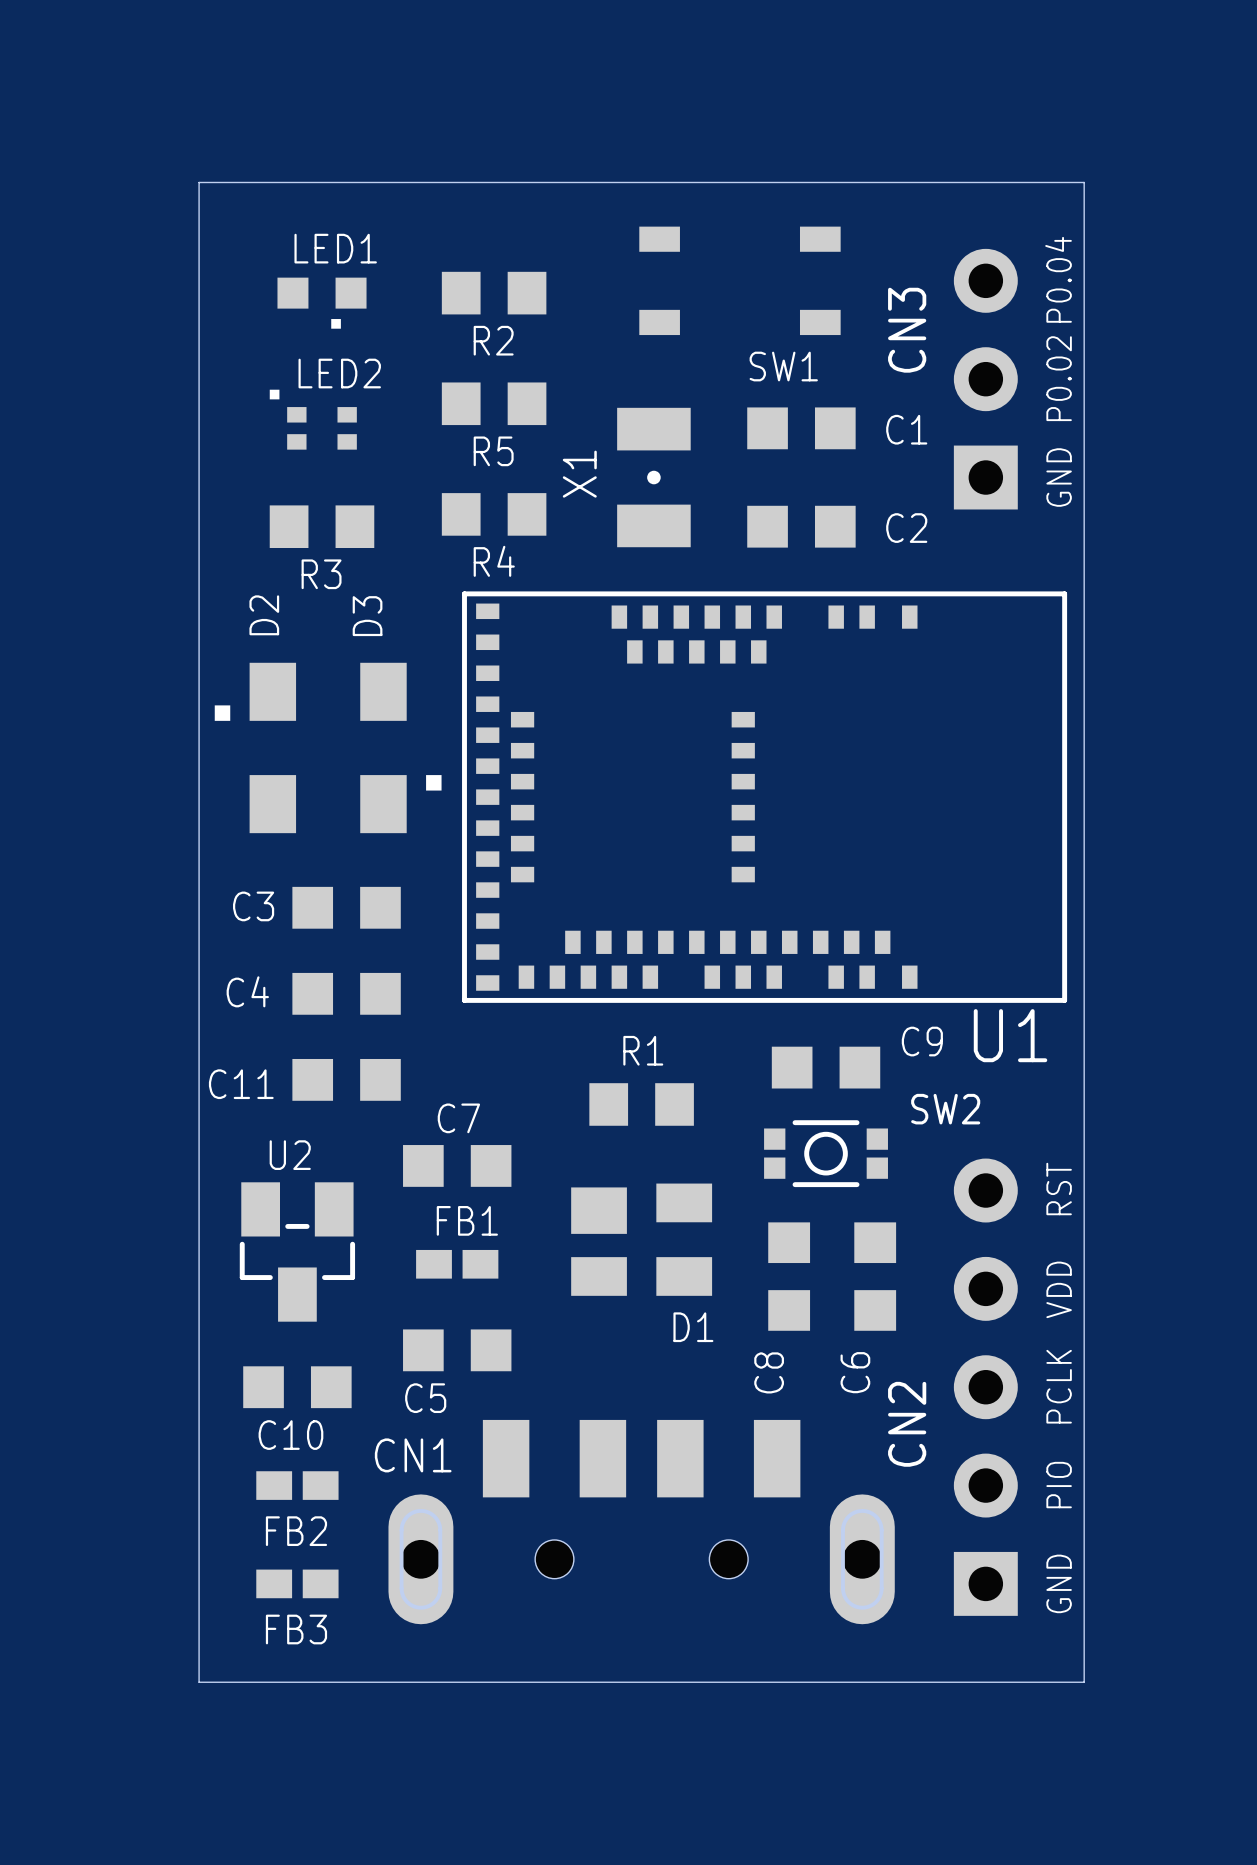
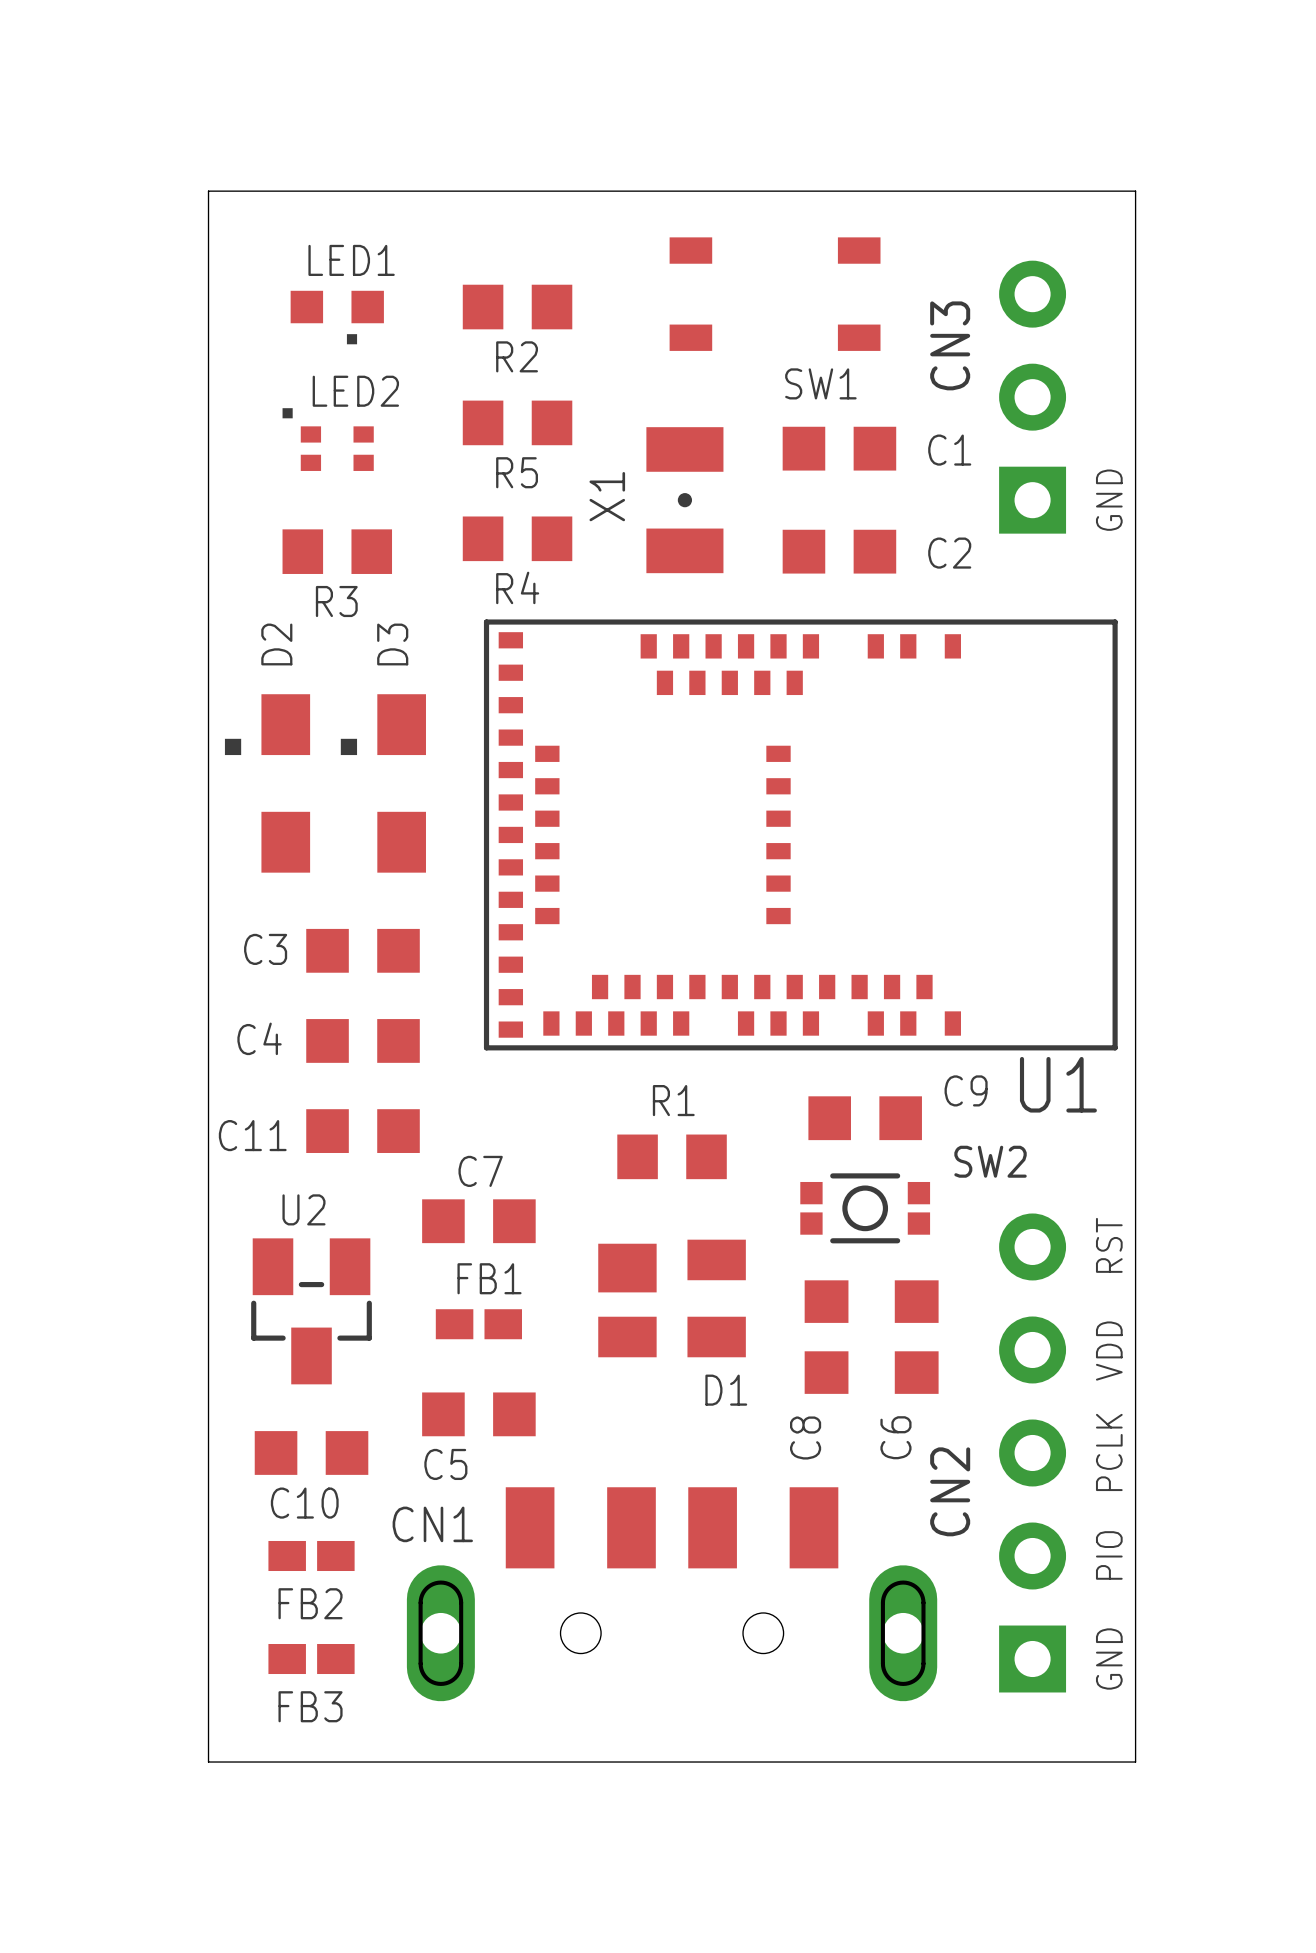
text: P0.04 (1058, 279) -> none
text: P0.02 (1059, 378) -> none
D3 rotation: 0° (400, 747) -> 180° (383, 783)

